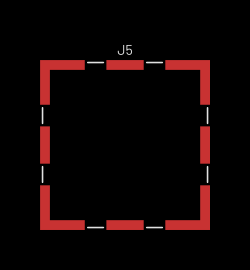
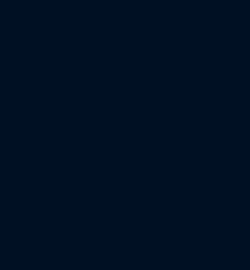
J5: (125, 145) -> none

